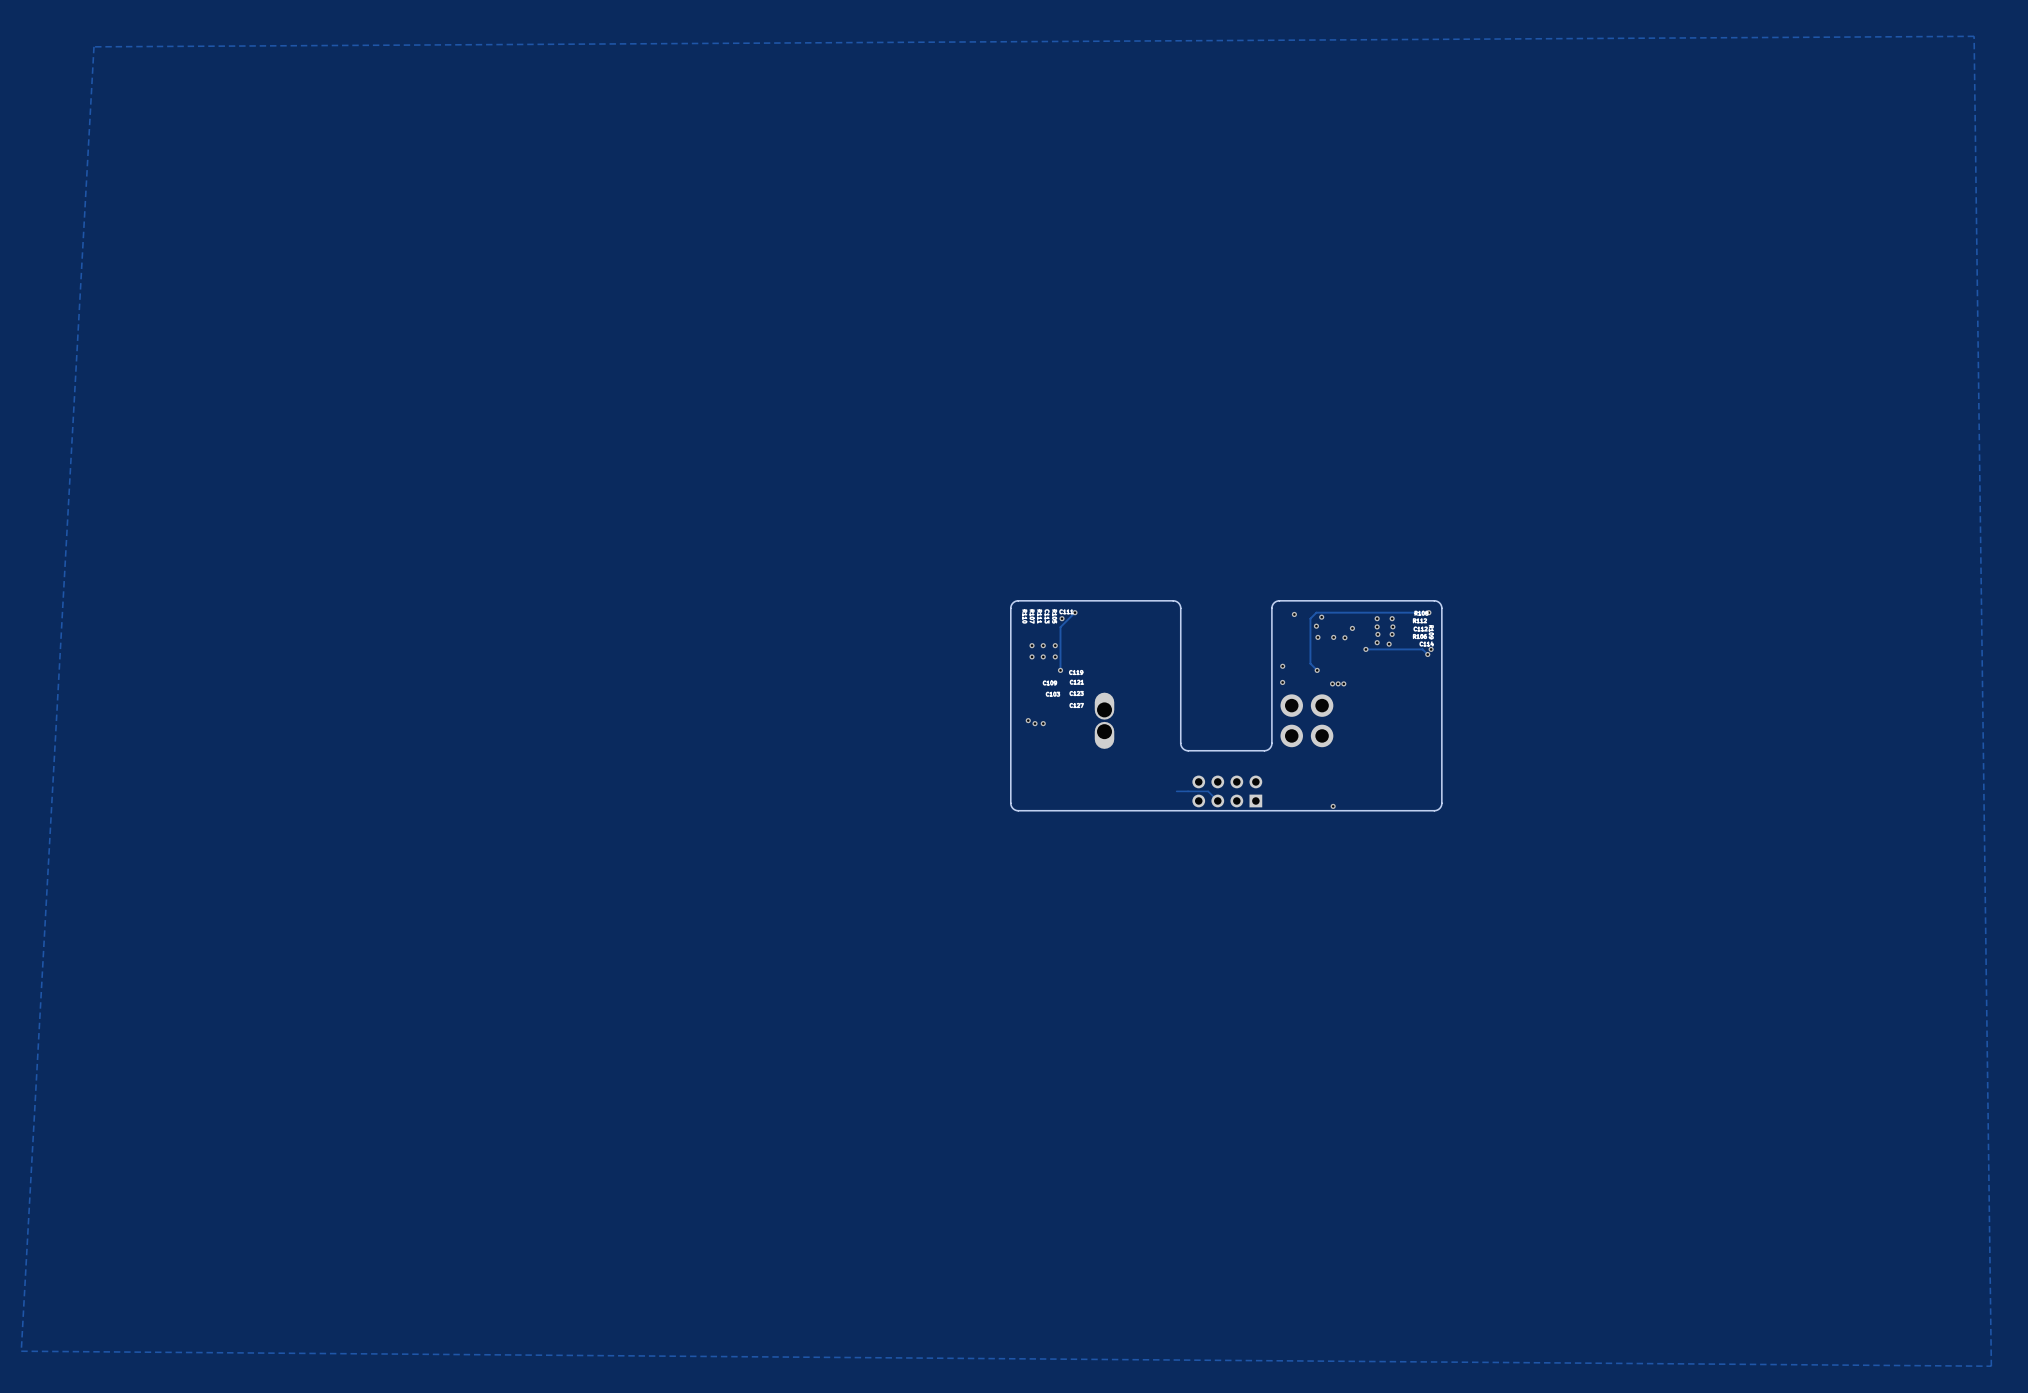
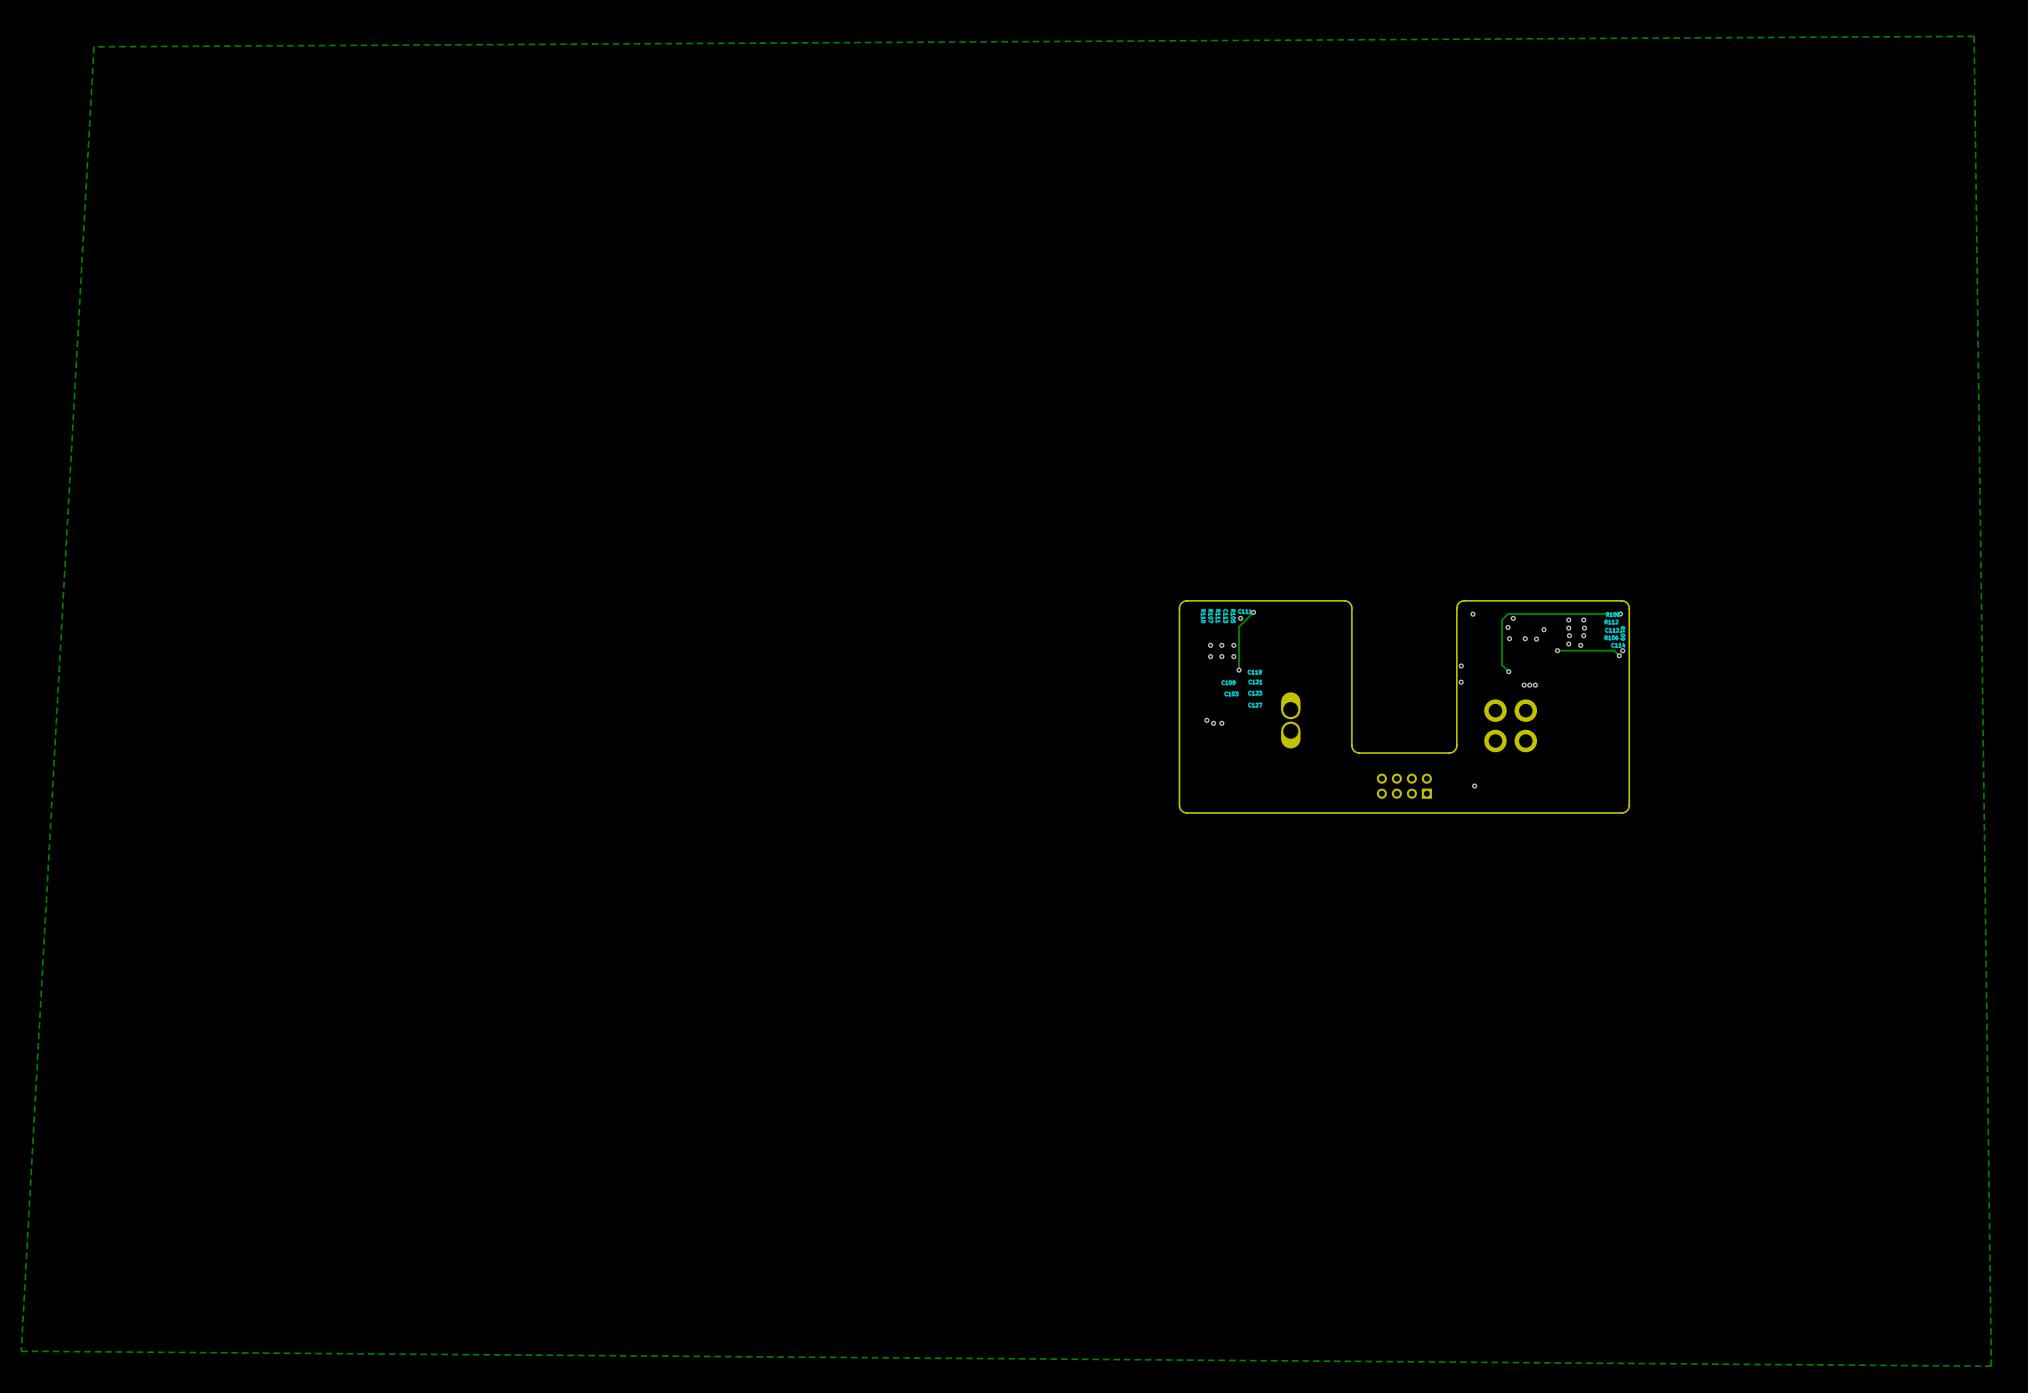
board edge: (1344, 600) (1434, 600) (1441, 605) (1441, 803) (1438, 809) (1018, 810) (1012, 807) (1010, 803) (1010, 608) (1013, 602) (1018, 600) (1177, 601) (1180, 608) (1181, 747) (1188, 750) (1264, 750) (1269, 748) (1271, 743) (1271, 607) (1274, 602) (1279, 600) -> (1344, 600) (1349, 602) (1351, 607) (1351, 745) (1354, 750) (1359, 753) (1449, 753) (1455, 749) (1456, 608) (1460, 601) (1621, 600) (1626, 602) (1629, 608) (1629, 805) (1627, 810) (1621, 812) (1182, 811) (1179, 805) (1180, 605) (1186, 600) (1279, 600)
part position: (1066, 611) -> (1244, 611)
track: (1074, 612) (1060, 627) (1060, 670) -> (1253, 612) (1239, 626) (1239, 670)
via: (1074, 612) -> none
via: none -> (1253, 612)
track: (1428, 612) (1316, 612) (1310, 618) (1310, 663) (1317, 670) -> none
via: (1428, 612) -> none
part position: (1421, 613) -> (1613, 614)
track: none -> (1620, 613) (1508, 613) (1502, 619) (1502, 664) (1508, 671)
via: none -> (1620, 613)
via: (1294, 614) -> none
via: none -> (1472, 614)
part position: (1024, 616) -> (1203, 616)
part position: (1032, 616) -> (1210, 616)
part position: (1039, 616) -> (1218, 616)
part position: (1047, 616) -> (1225, 616)
part position: (1054, 616) -> (1233, 616)
via: (1321, 617) -> none
via: (1062, 618) -> none
via: none -> (1240, 618)
via: (1377, 618) -> none
via: (1392, 618) -> none
via: none -> (1513, 618)
via: none -> (1568, 619)
via: none -> (1583, 619)
part position: (1419, 620) -> (1611, 622)
via: (1316, 626) -> none
via: (1377, 626) -> none
via: (1392, 626) -> none
via: none -> (1508, 627)
via: (1352, 628) -> none
via: none -> (1568, 628)
via: none -> (1584, 628)
part position: (1420, 629) -> (1612, 630)
via: none -> (1543, 629)
part position: (1431, 632) -> (1622, 633)
via: (1377, 634) -> none
via: (1392, 634) -> none
via: none -> (1569, 635)
via: none -> (1583, 635)
part position: (1419, 636) -> (1611, 637)
via: (1317, 637) -> none
via: (1333, 637) -> none
via: (1344, 637) -> none
via: none -> (1509, 638)
via: none -> (1525, 638)
via: none -> (1536, 639)
via: (1377, 642) -> none
part position: (1426, 643) -> (1618, 645)
via: none -> (1568, 643)
via: (1389, 644) -> none
via: (1032, 645) -> none
via: (1043, 645) -> none
via: (1055, 645) -> none
via: none -> (1210, 645)
via: none -> (1221, 645)
via: none -> (1233, 645)
via: none -> (1580, 645)
track: (1365, 649) (1422, 649) (1427, 654) -> none
via: (1365, 649) -> none
via: (1431, 649) -> none
track: none -> (1557, 650) (1614, 650) (1619, 655)
via: none -> (1557, 650)
via: none -> (1622, 650)
via: (1427, 654) -> none
via: none -> (1619, 655)
via: (1032, 656) -> none
via: (1043, 656) -> none
via: (1055, 656) -> none
via: none -> (1210, 656)
via: none -> (1221, 656)
via: none -> (1233, 656)
via: none -> (1461, 665)
via: (1282, 666) -> none
via: (1060, 670) -> none
via: none -> (1239, 670)
via: (1317, 670) -> none
via: none -> (1508, 671)
part position: (1076, 672) -> (1254, 672)
part position: (1076, 682) -> (1255, 681)
via: (1282, 682) -> none
via: none -> (1461, 682)
part position: (1049, 683) -> (1228, 682)
via: (1332, 683) -> none
via: (1338, 683) -> none
via: (1343, 683) -> none
via: none -> (1524, 685)
via: none -> (1529, 685)
via: none -> (1535, 685)
part position: (1076, 693) -> (1255, 693)
part position: (1052, 694) -> (1231, 693)
part position: (1076, 705) -> (1255, 705)
via: (1028, 720) -> none
part position: (1104, 720) -> (1290, 720)
via: none -> (1206, 720)
part: (1306, 720) -> none
via: (1035, 723) -> none
via: (1043, 723) -> none
via: none -> (1213, 723)
via: none -> (1221, 723)
part: none -> (1510, 725)
part: none -> (1404, 786)
via: none -> (1474, 786)
track: (1176, 791) (1208, 791) (1217, 800) -> none
part: (1227, 791) -> none
via: (1333, 806) -> none

